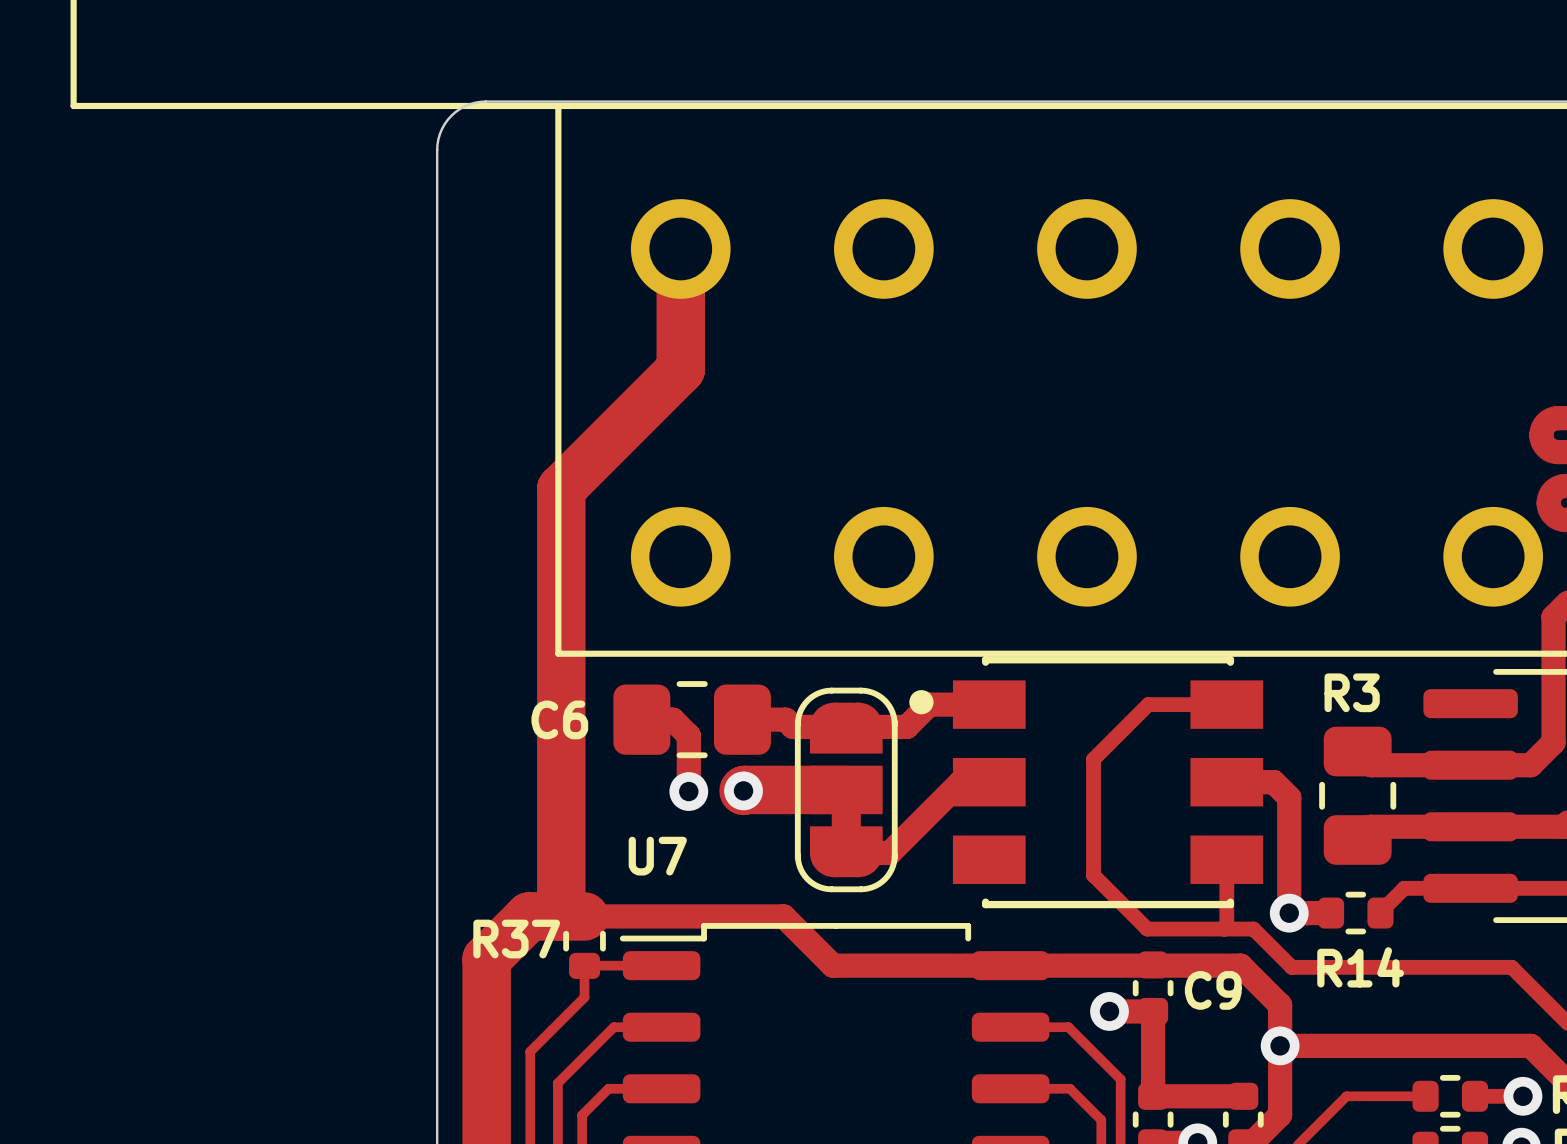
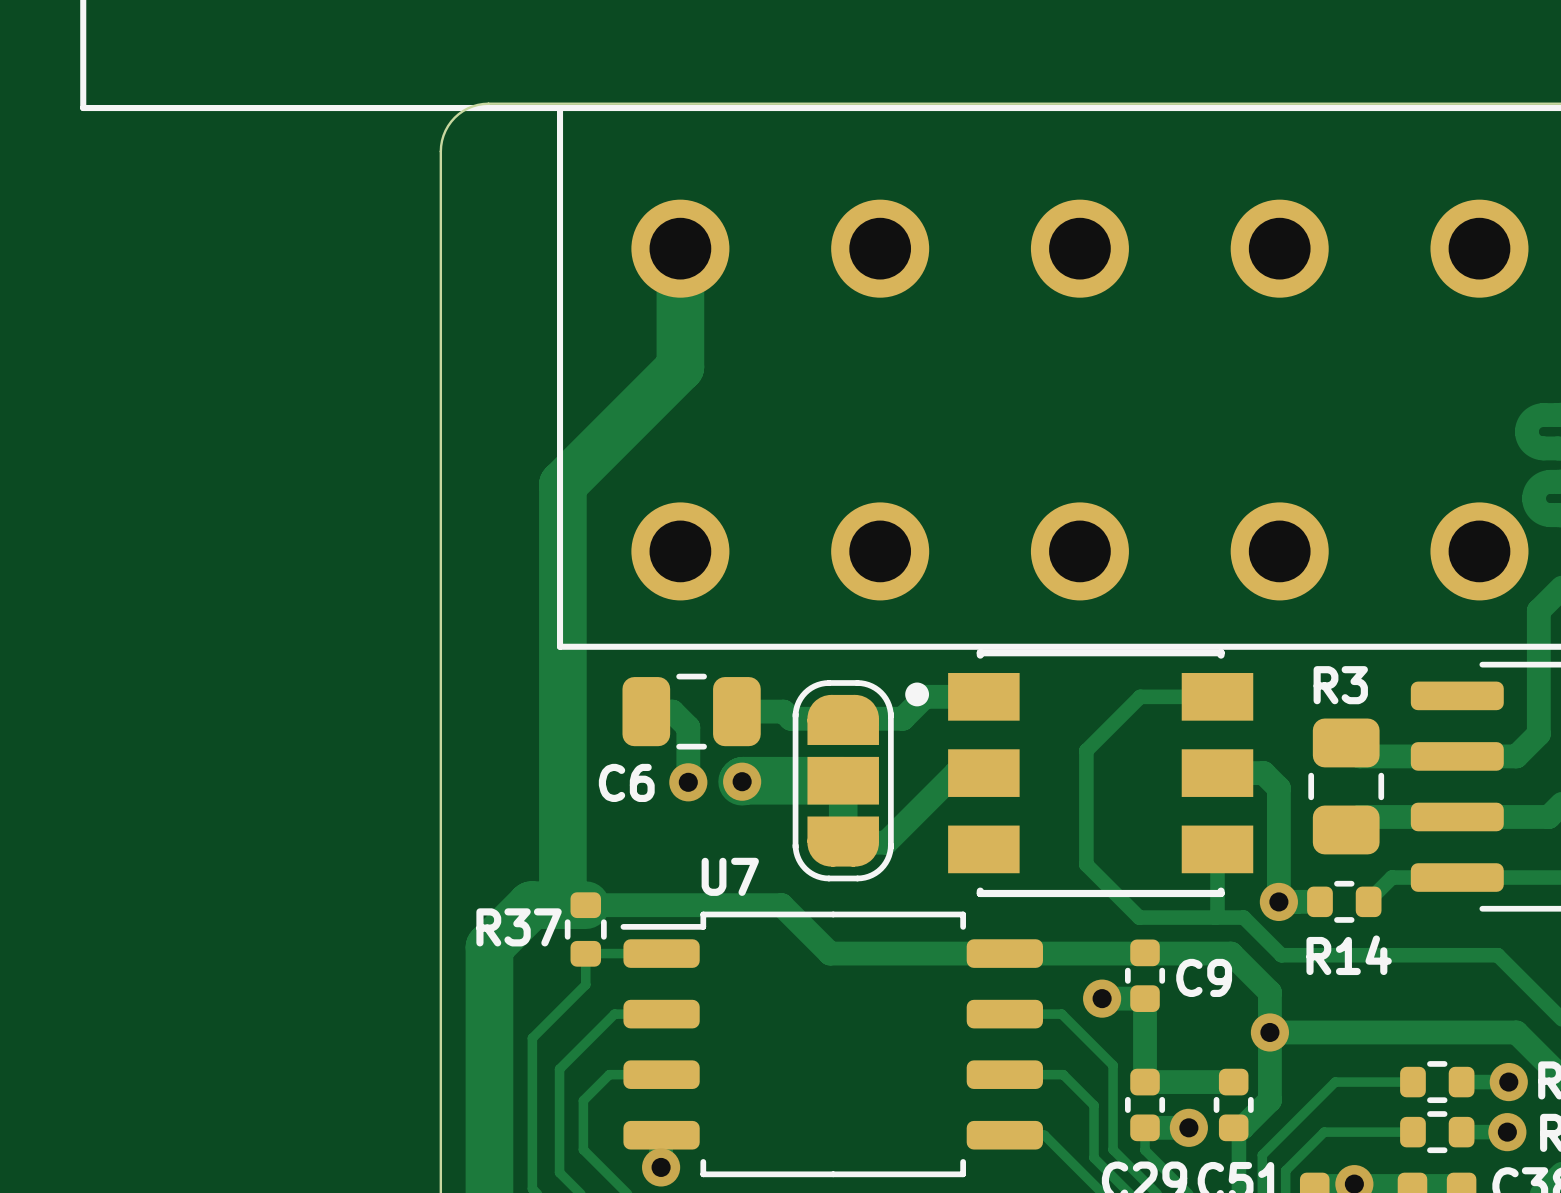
C6 footprint: [613, 681, 771, 759] -> [622, 673, 761, 750]
C6 name position: C6 (559, 719) -> C6 (626, 782)
U7 name position: U7 (657, 856) -> U7 (730, 876)

